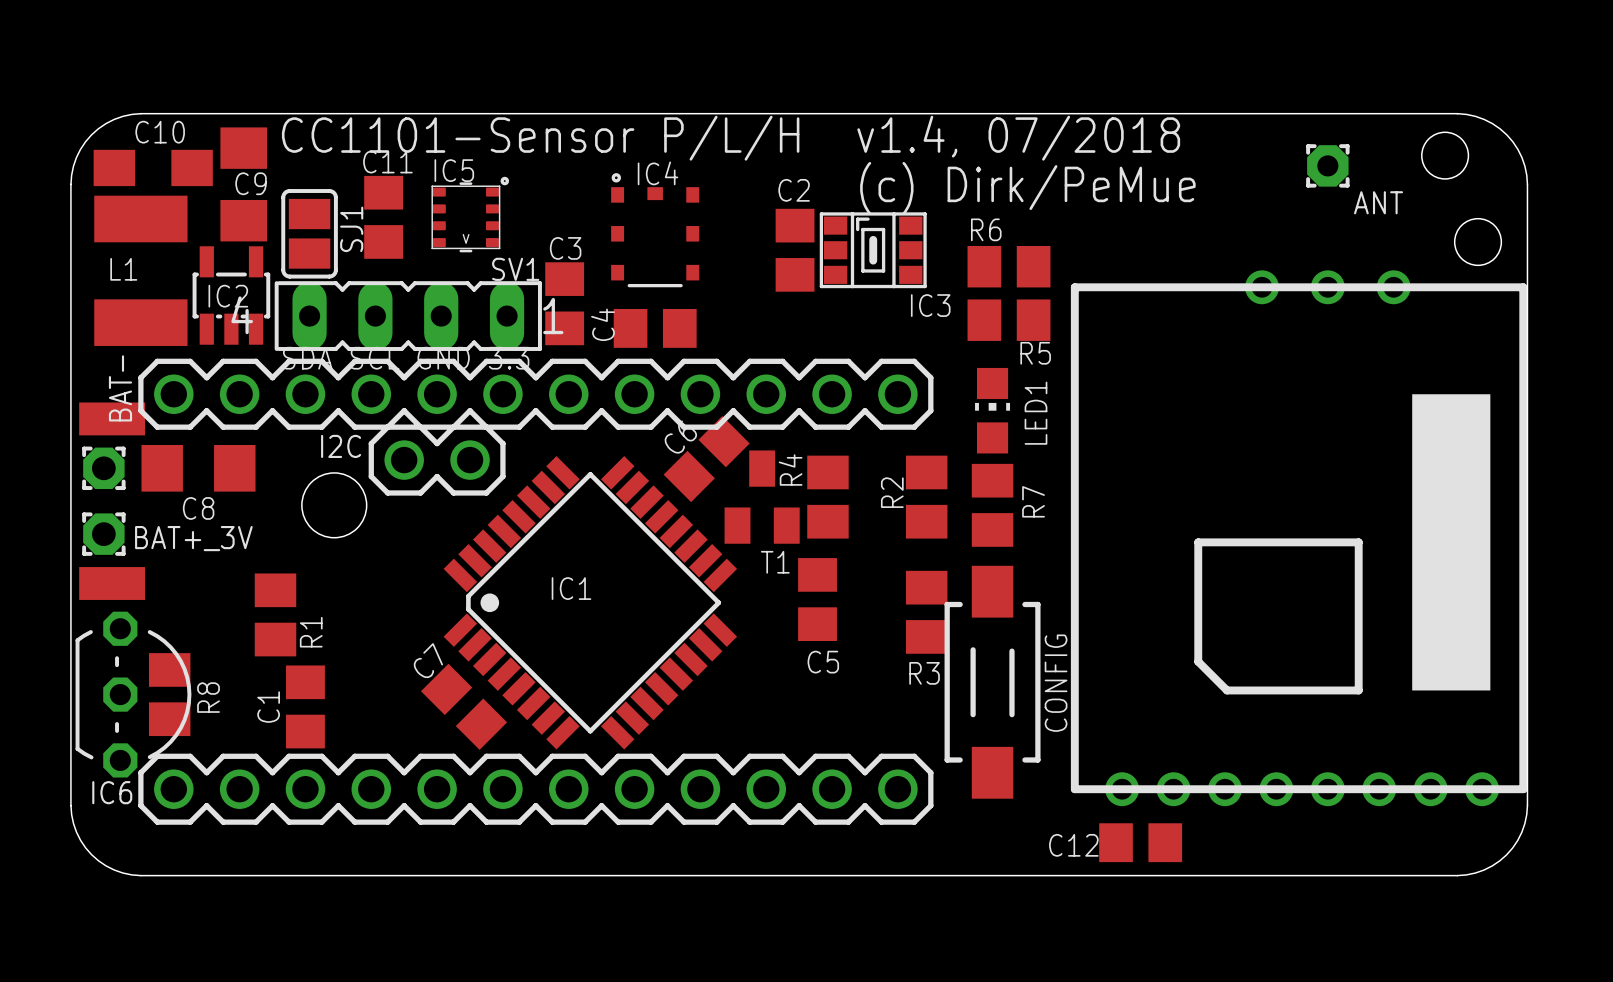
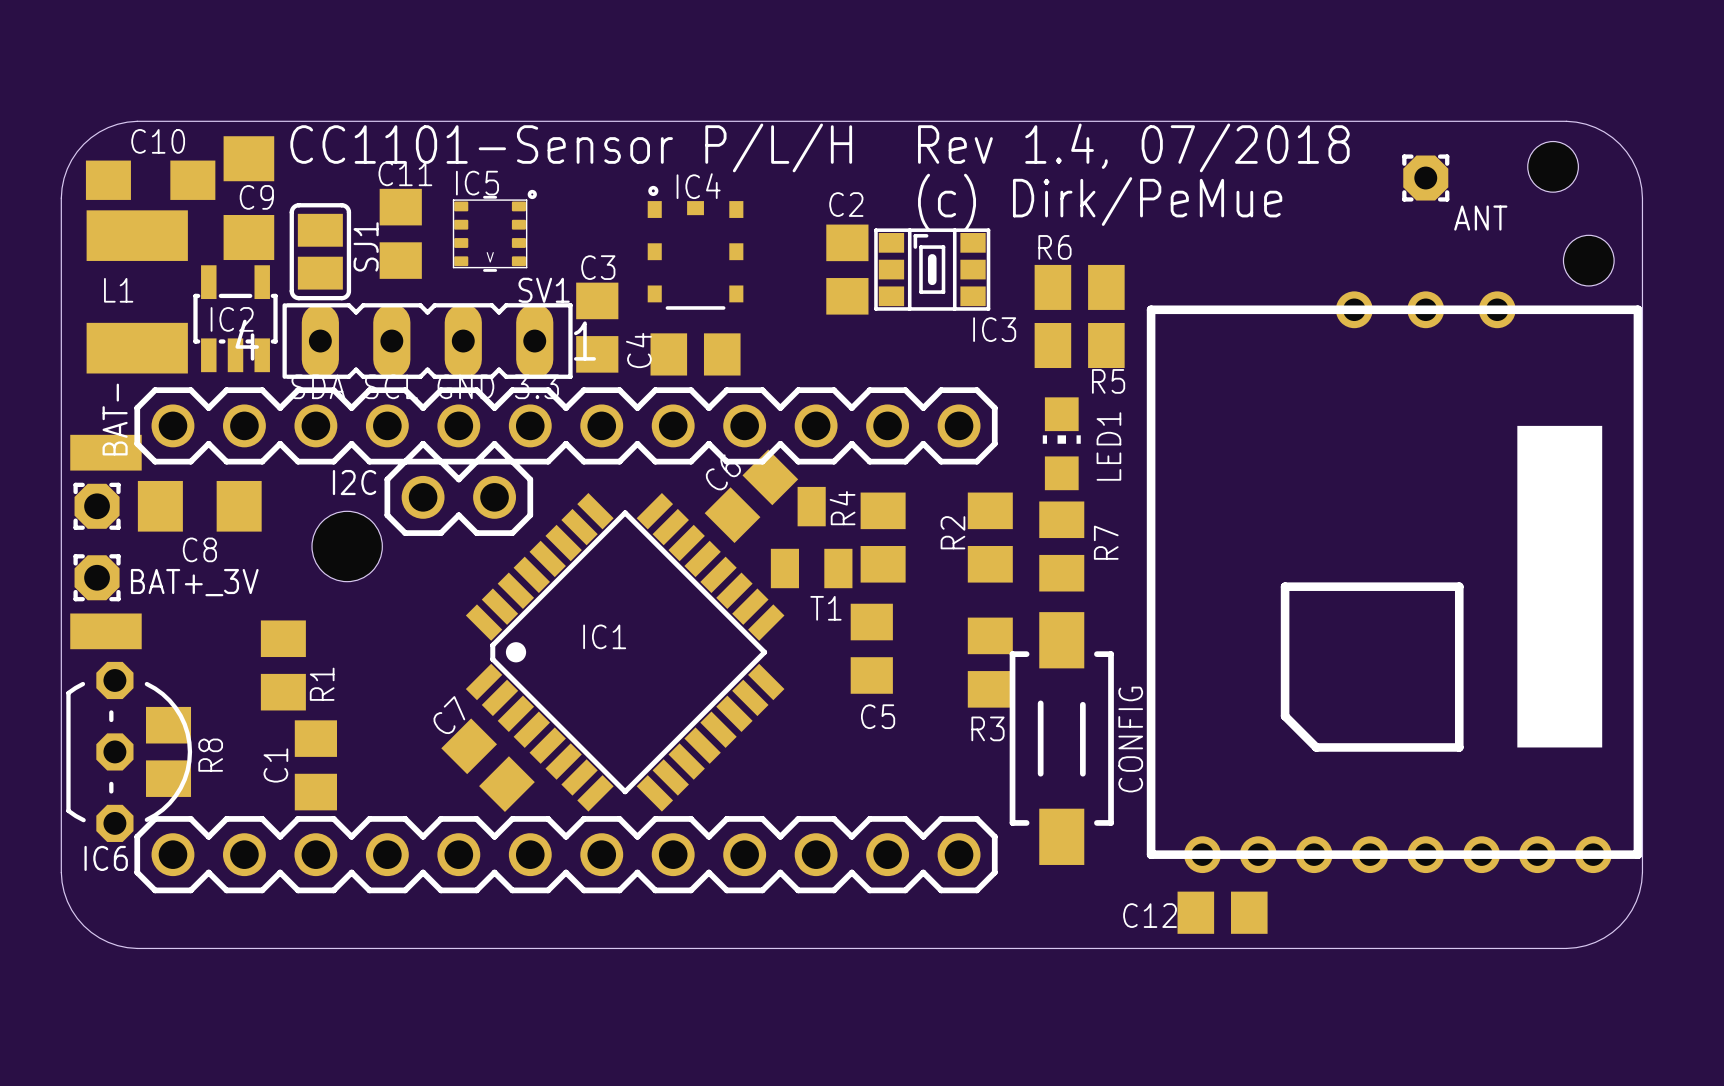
text: v1.4, 07/2018 (1018, 138) -> Rev 1.4, 07/2018 (1133, 147)

